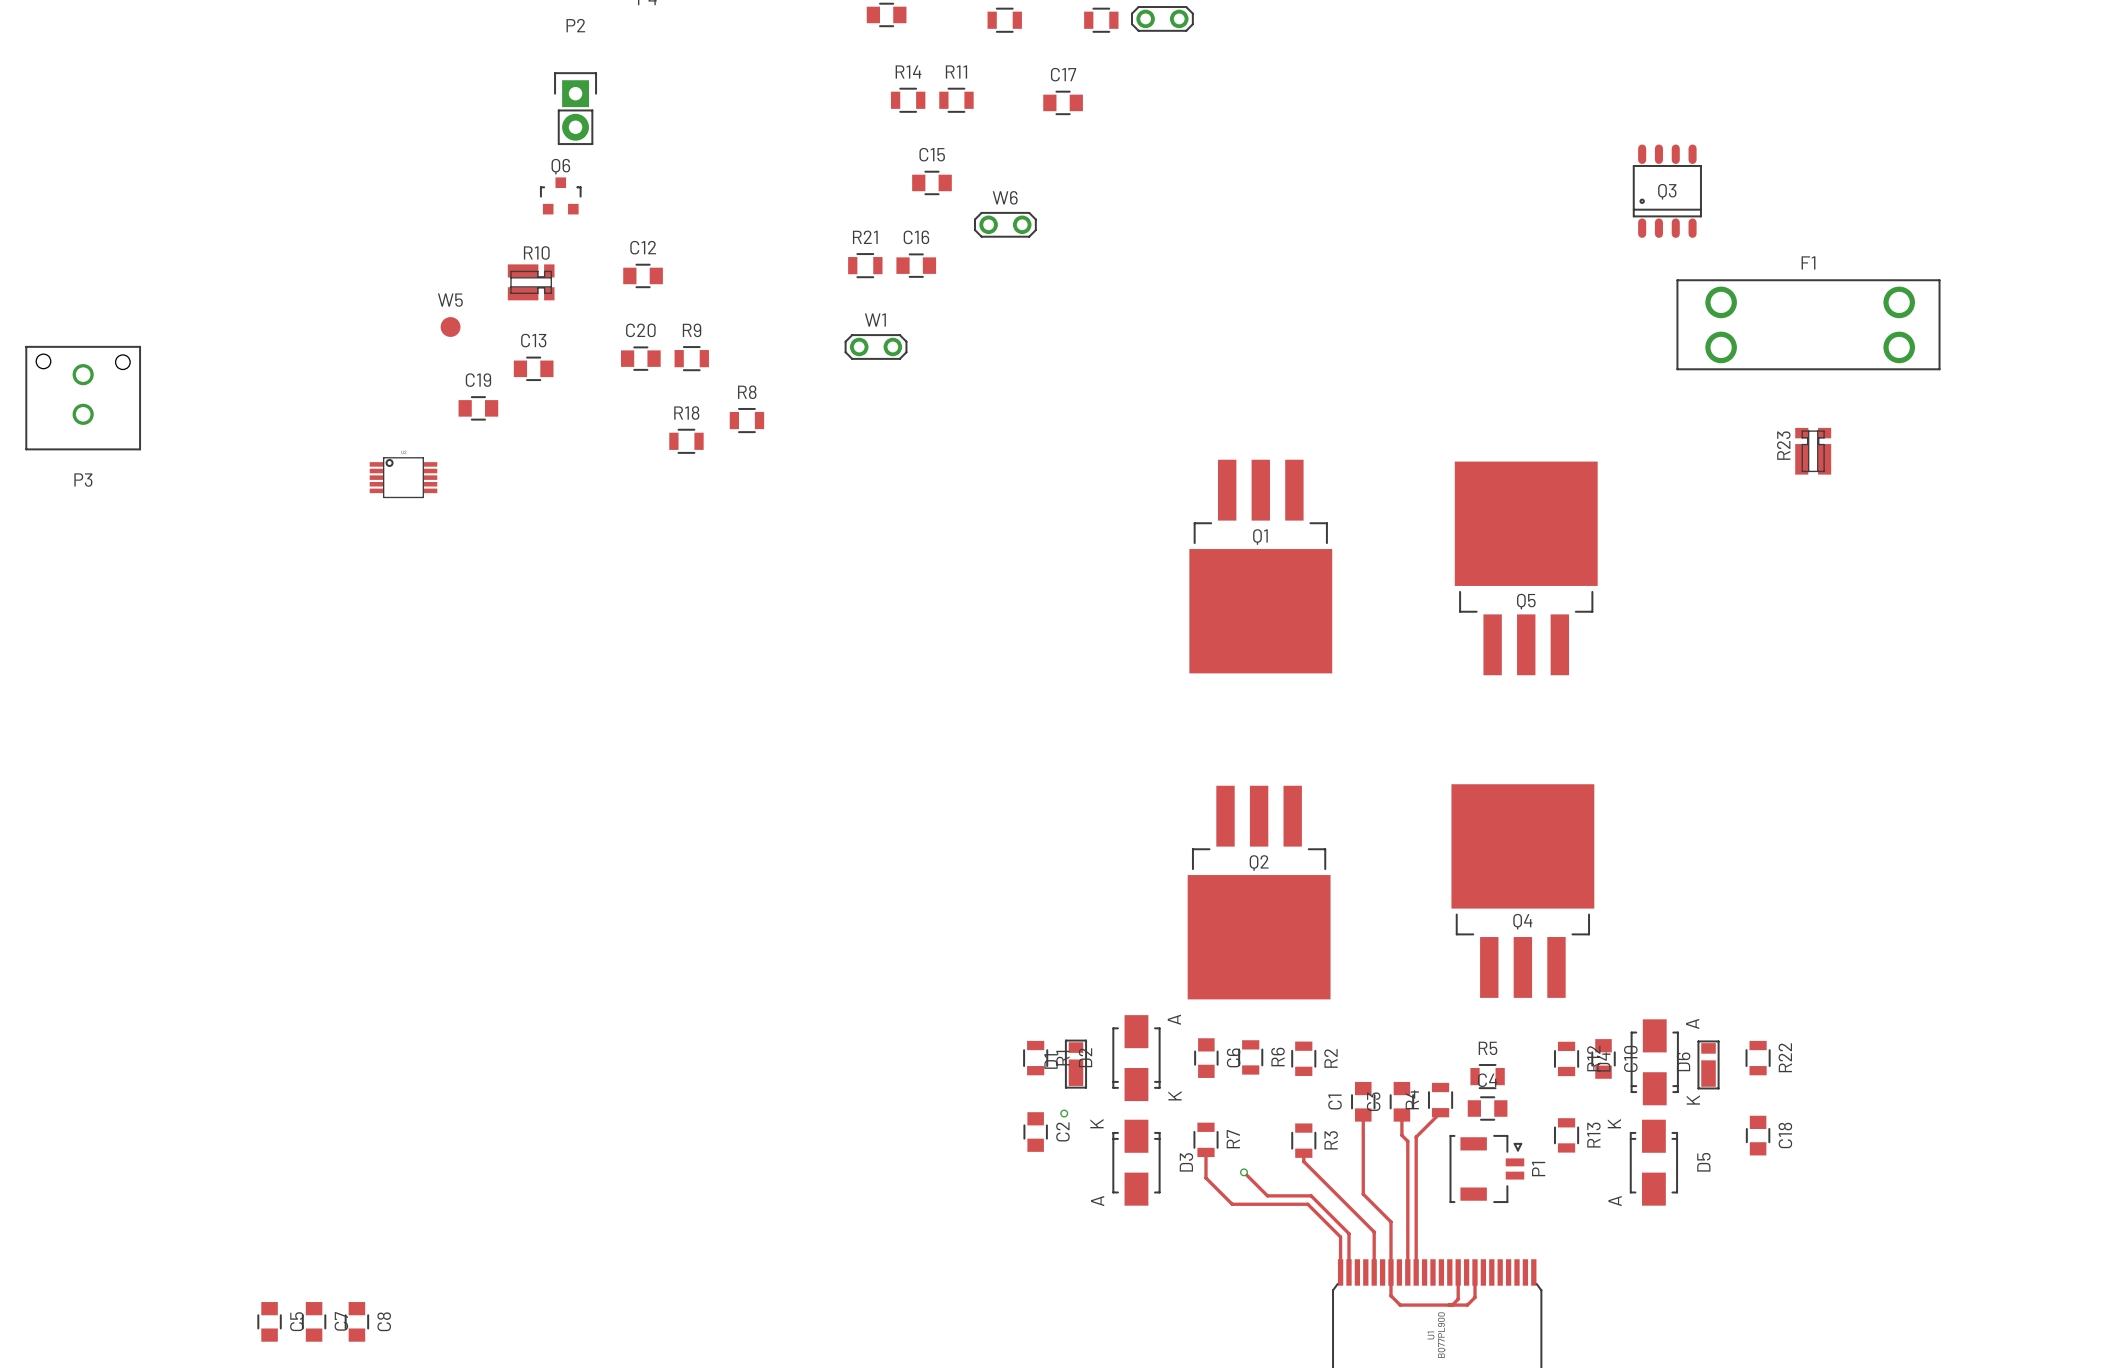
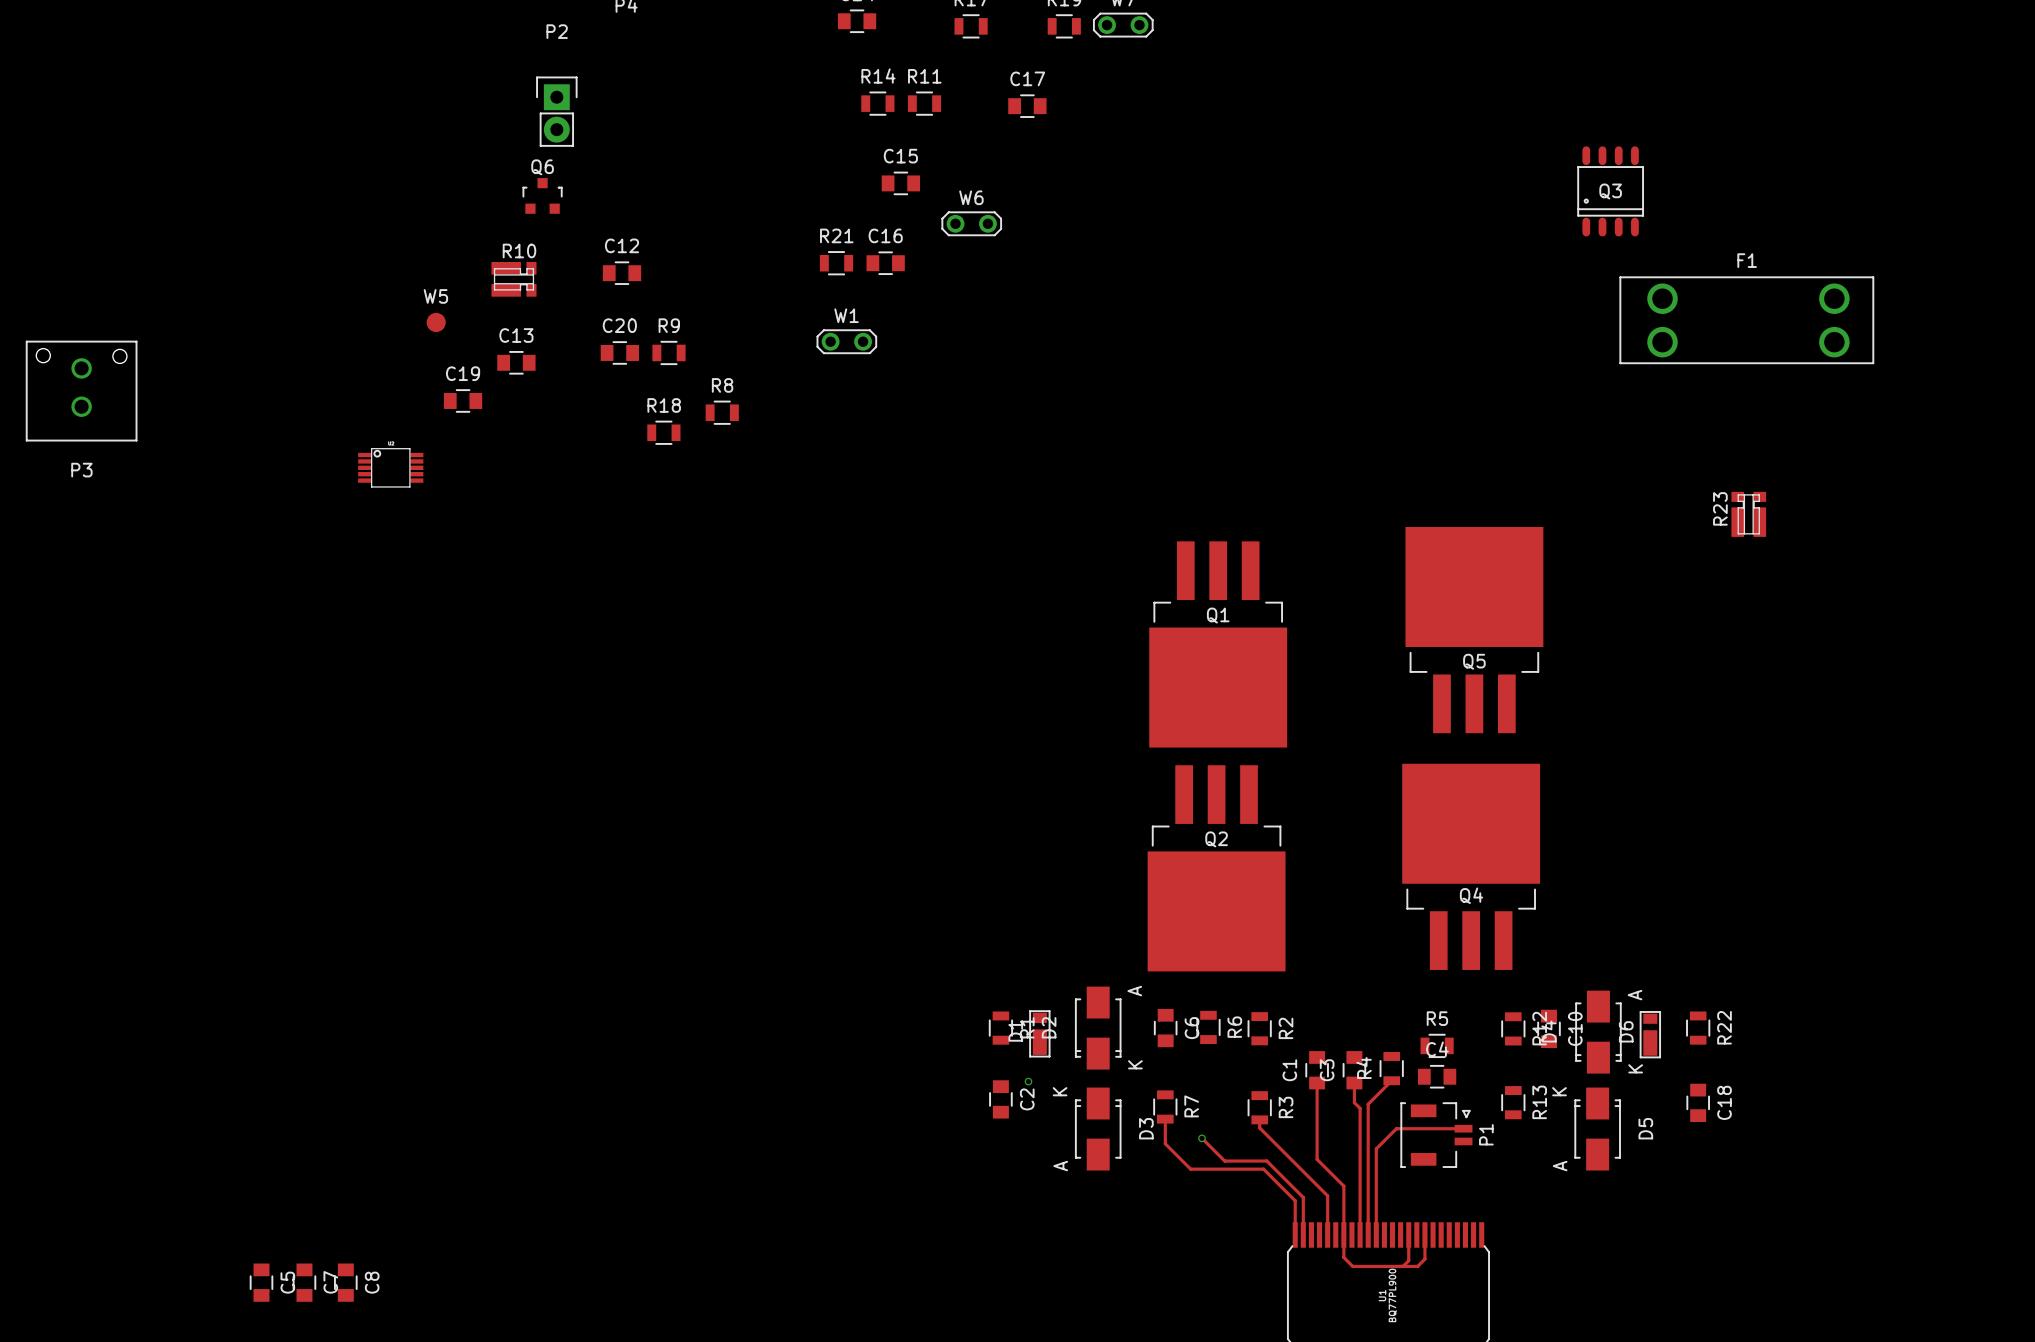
R23 position: (1813, 451) -> (1748, 514)
Q1 position: (1260, 566) -> (1218, 644)
Q5 position: (1526, 568) -> (1474, 630)
track: none -> (1463, 1128) (1396, 1128) (1376, 1148) (1376, 1234)

